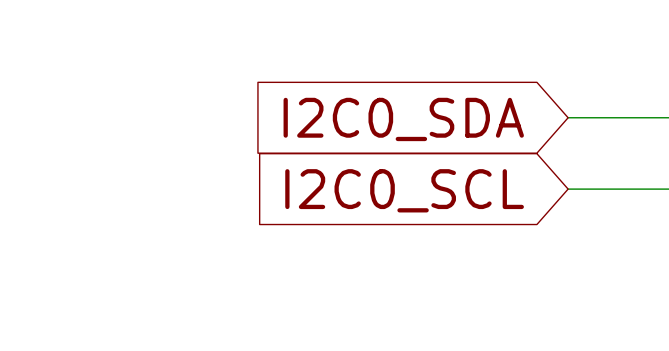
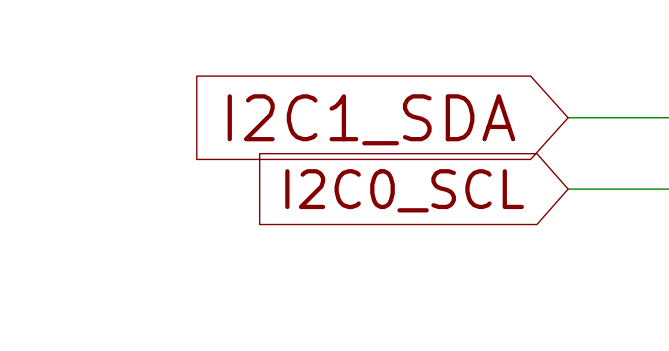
global label: I2C0_SDA (403, 119) -> I2C1_SDA (371, 119)

